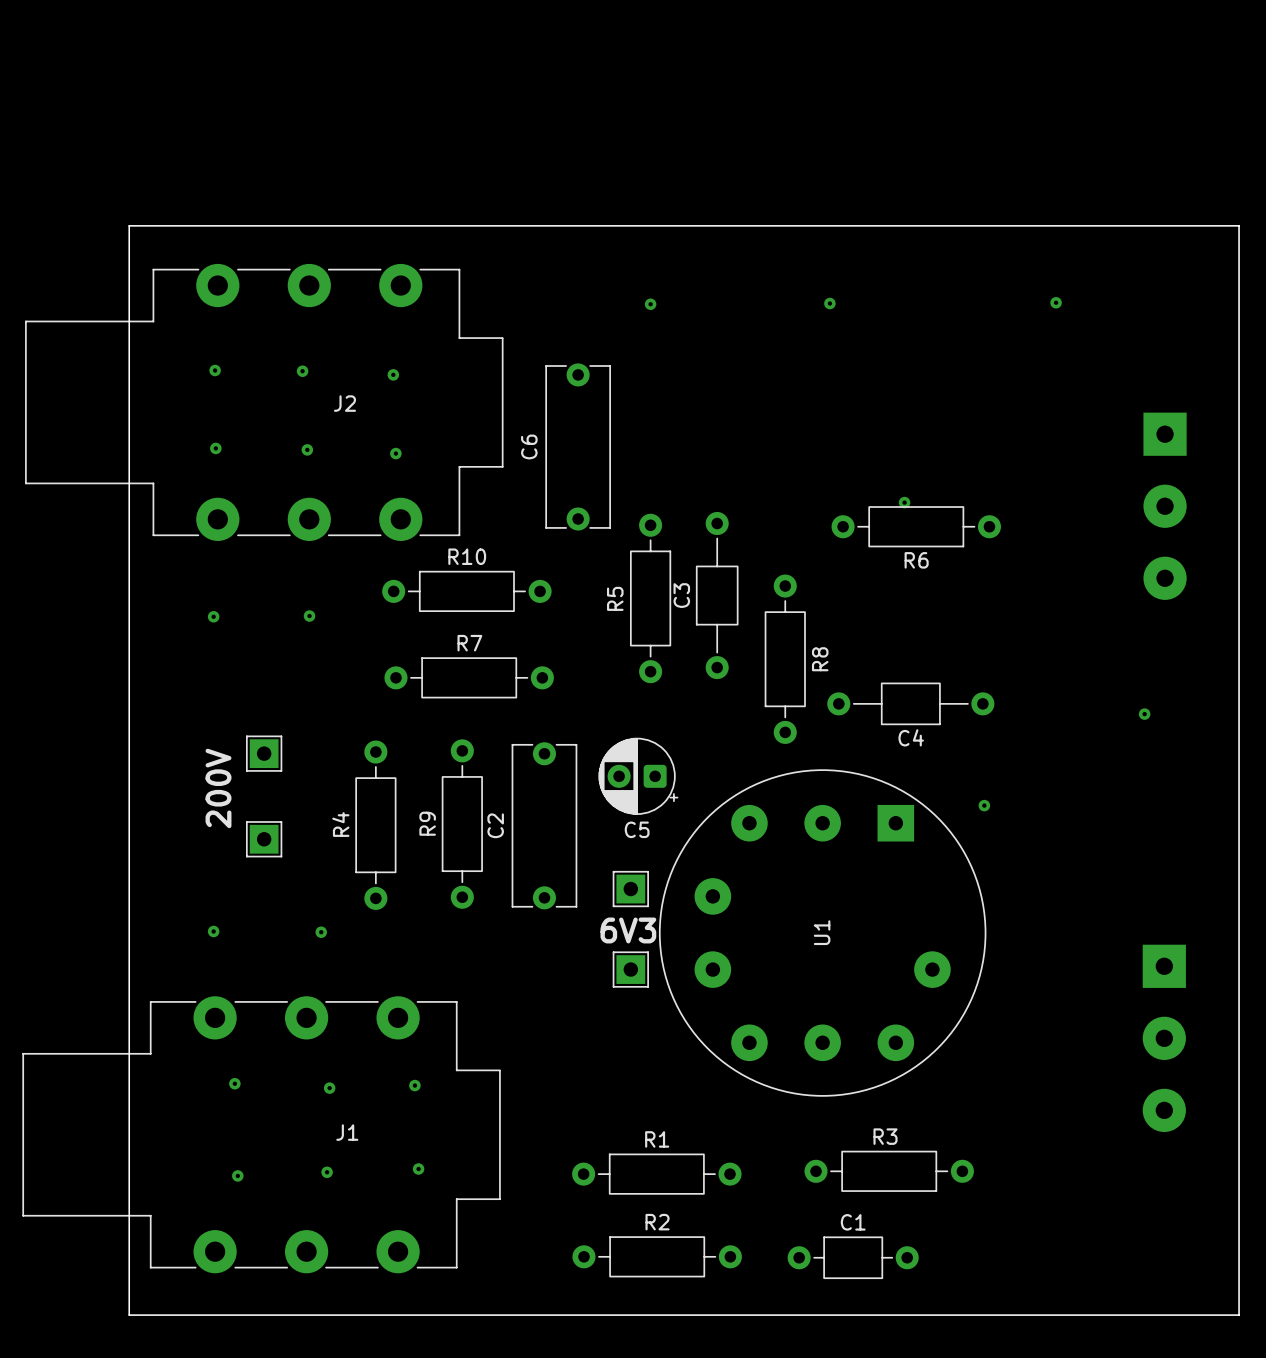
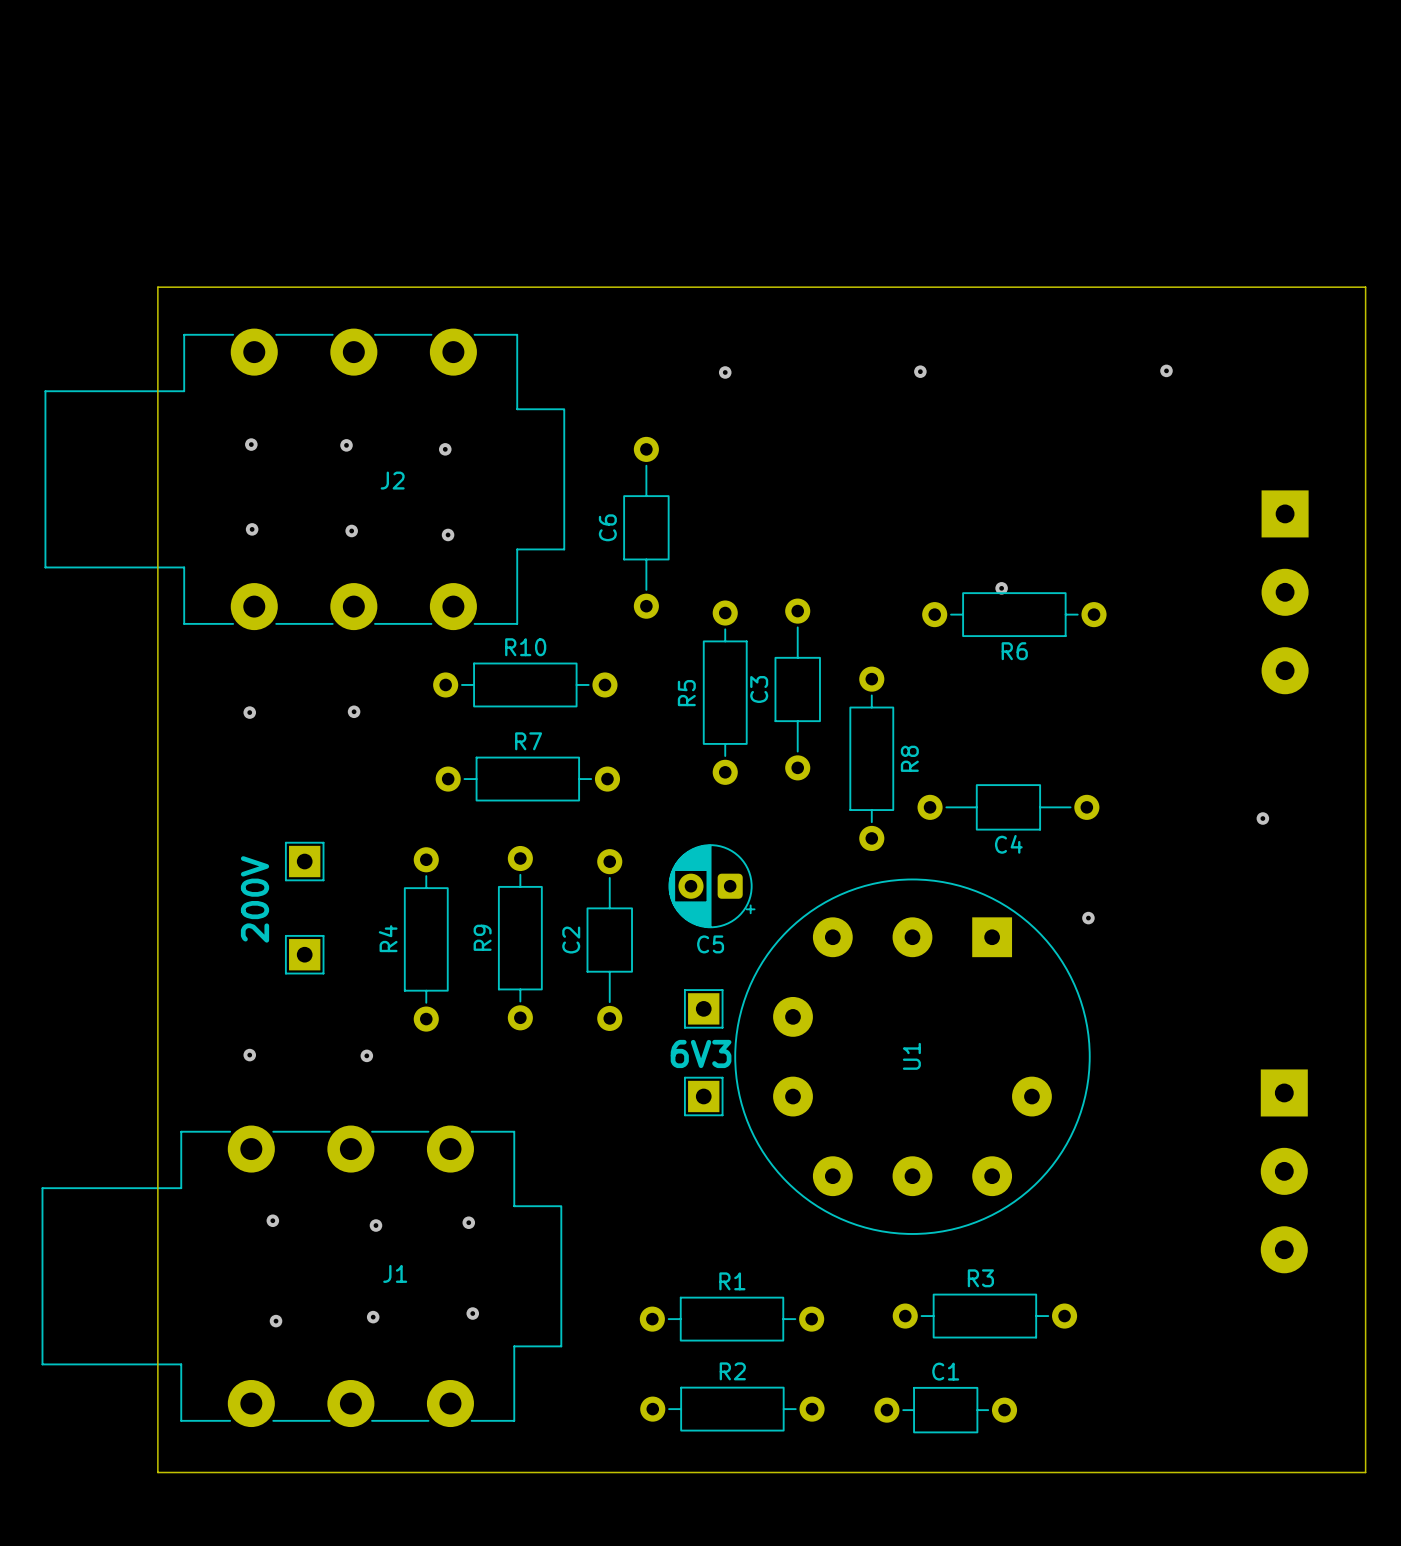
C6 footprint: [545, 363, 611, 531] -> [623, 436, 670, 619]
C2 footprint: [511, 742, 578, 910] -> [586, 849, 633, 1031]

